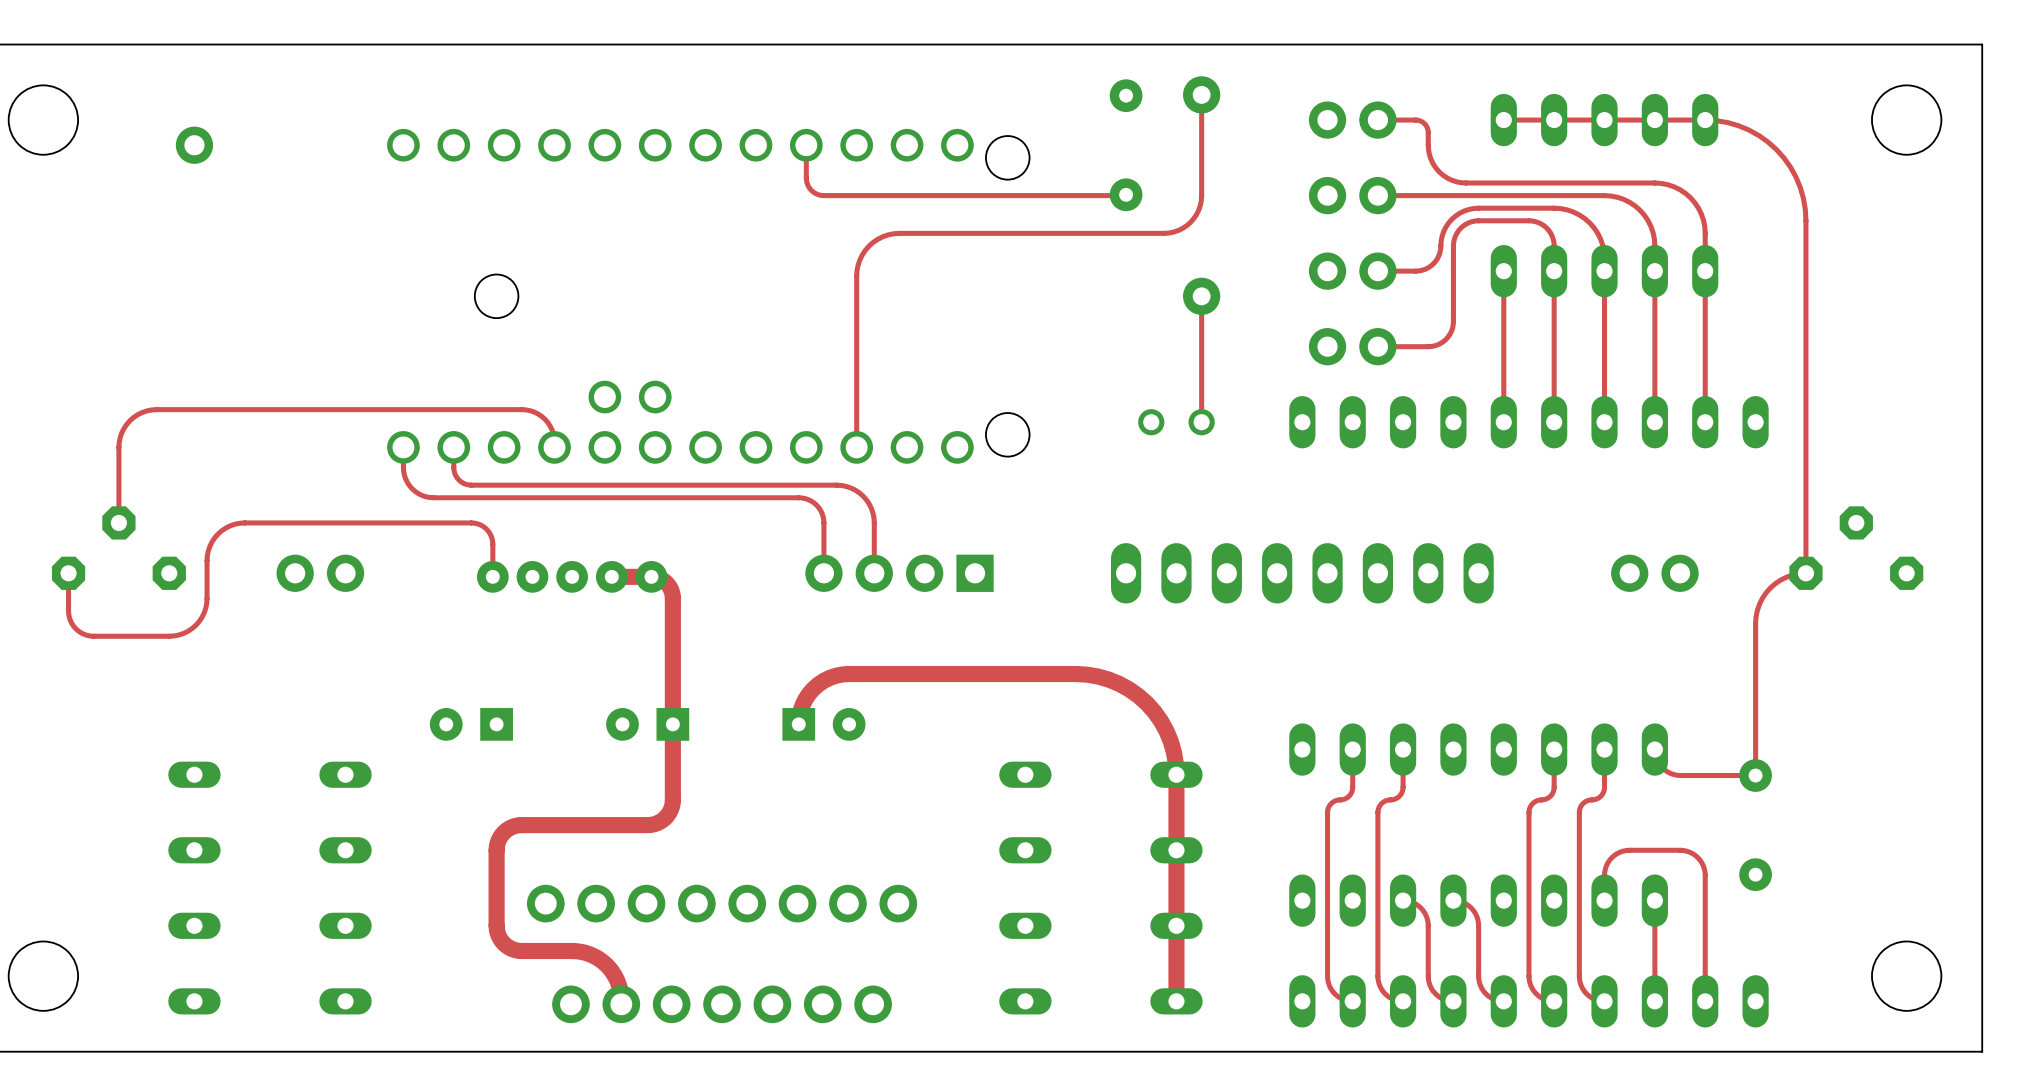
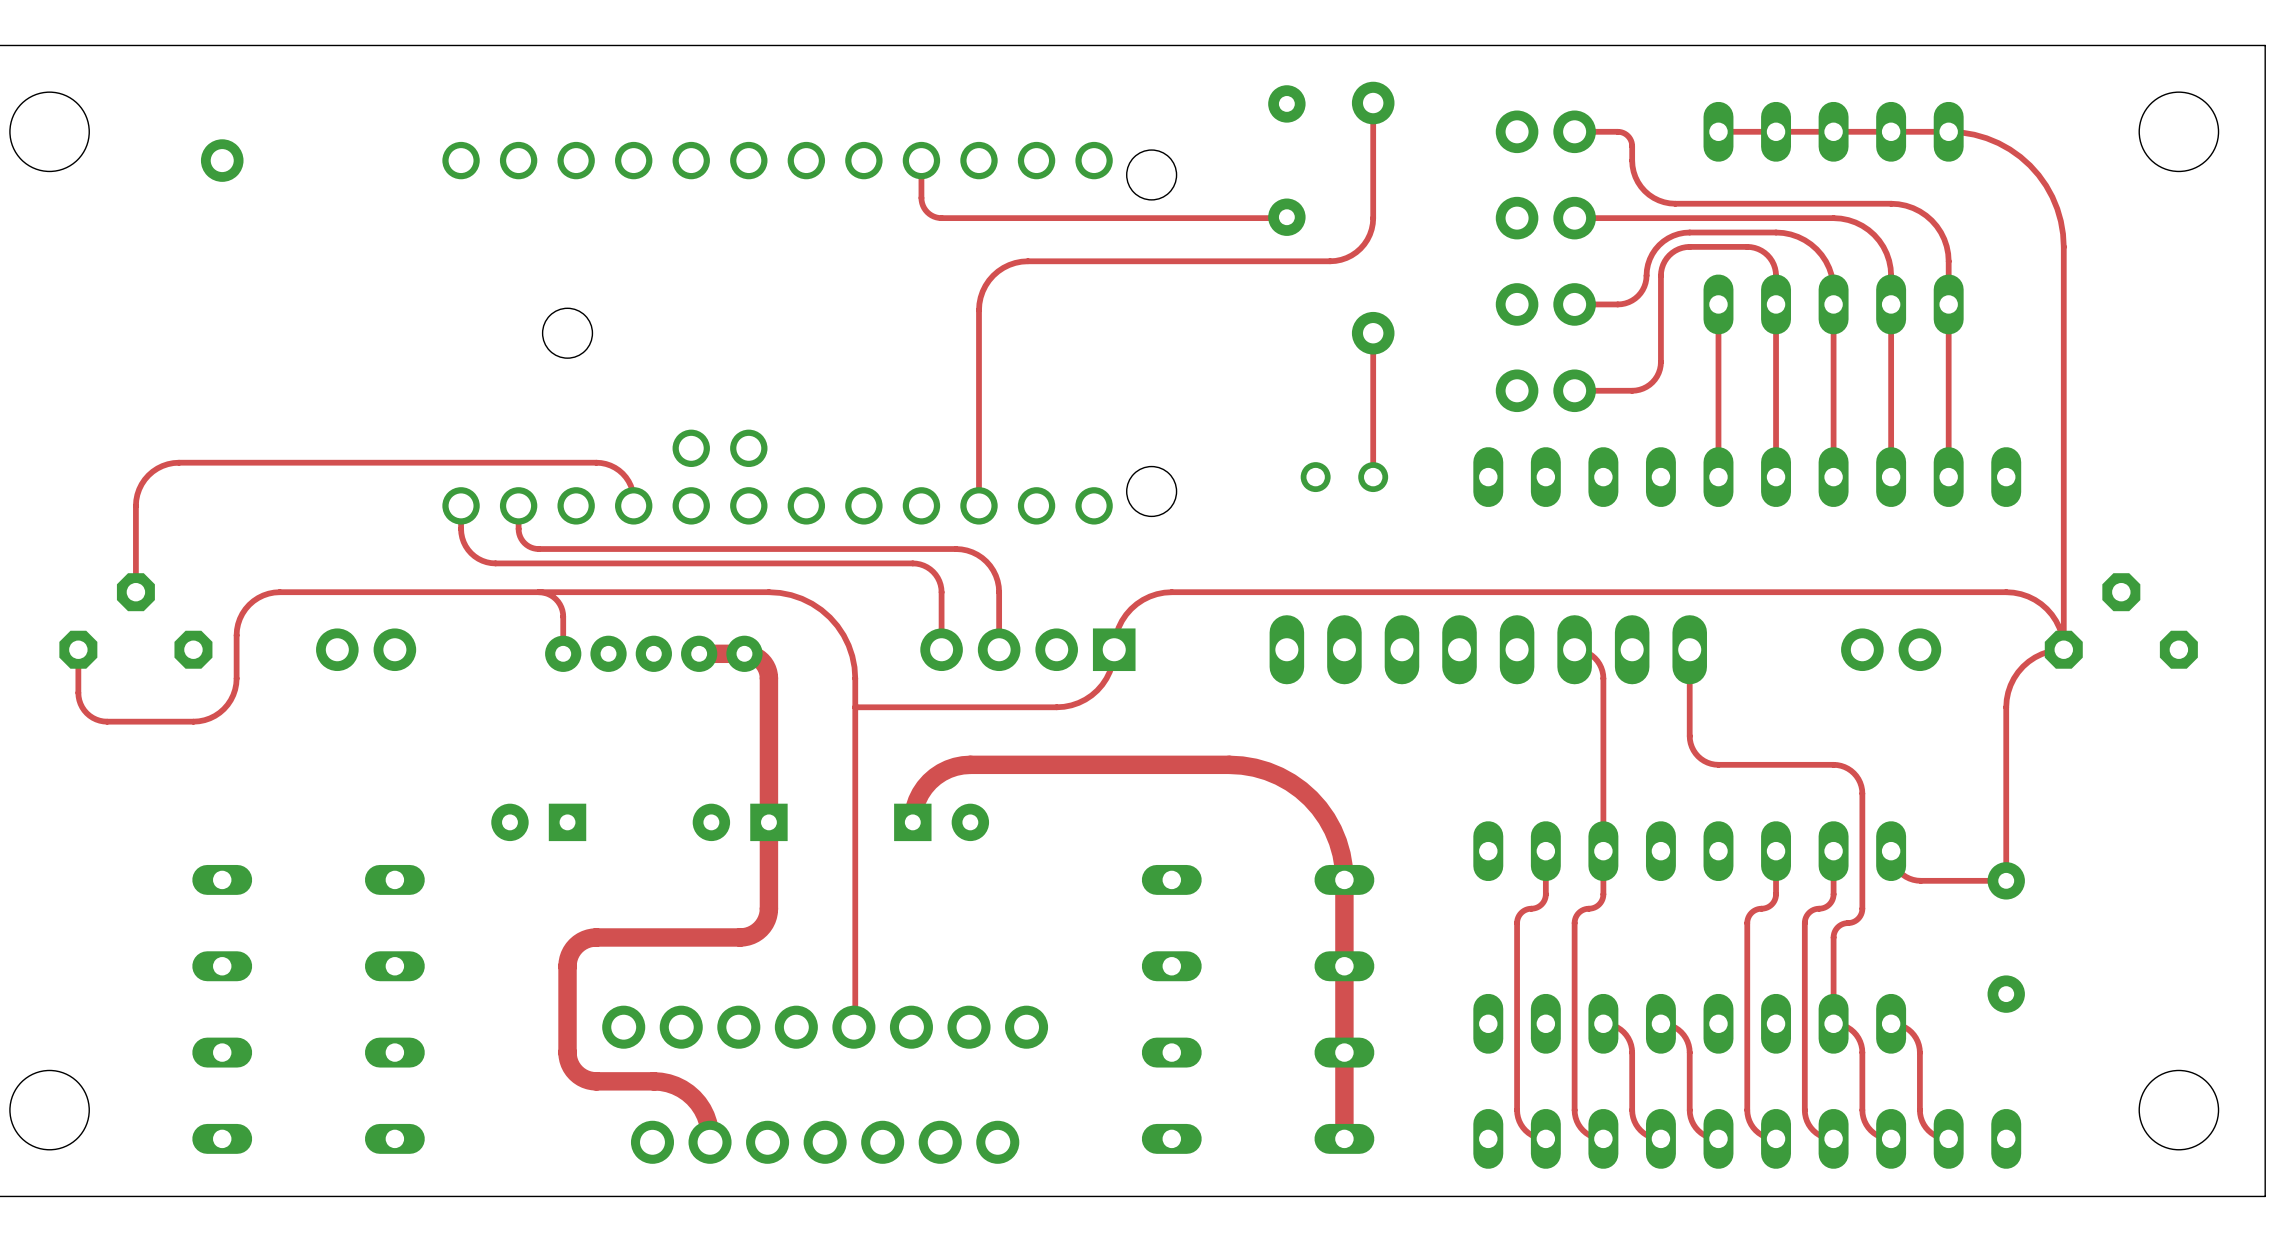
top track: none -> (538, 592) (780, 592) (812, 603) (837, 625) (852, 656) (855, 678) (853, 1027)
top track: none -> (1574, 649) (1585, 651) (1594, 658) (1603, 674) (1603, 851)
top track: none -> (1689, 649) (1689, 739) (1693, 750) (1700, 758) (1718, 764) (1837, 765) (1851, 770) (1860, 782) (1862, 793) (1862, 910) (1856, 920) (1840, 925) (1834, 933) (1833, 995)
top track: none -> (2063, 649) (2059, 627) (2046, 609) (2028, 596) (2006, 592) (1171, 592) (1156, 594) (1143, 599) (1126, 614) (1116, 634) (1112, 664) (1106, 678) (1097, 690) (1078, 702) (1056, 707) (855, 707)
top track: (1604, 875) (1606, 865) (1611, 857) (1626, 850) (1683, 850) (1692, 853) (1700, 860) (1705, 875) (1705, 1001) -> (1891, 1023) (1905, 1027) (1916, 1038) (1919, 1052) (1920, 1117) (1931, 1132) (1948, 1138)
top track: (1654, 900) (1654, 1001) -> (1833, 1023) (1847, 1027) (1858, 1038) (1862, 1052) (1863, 1117) (1873, 1132) (1891, 1138)

